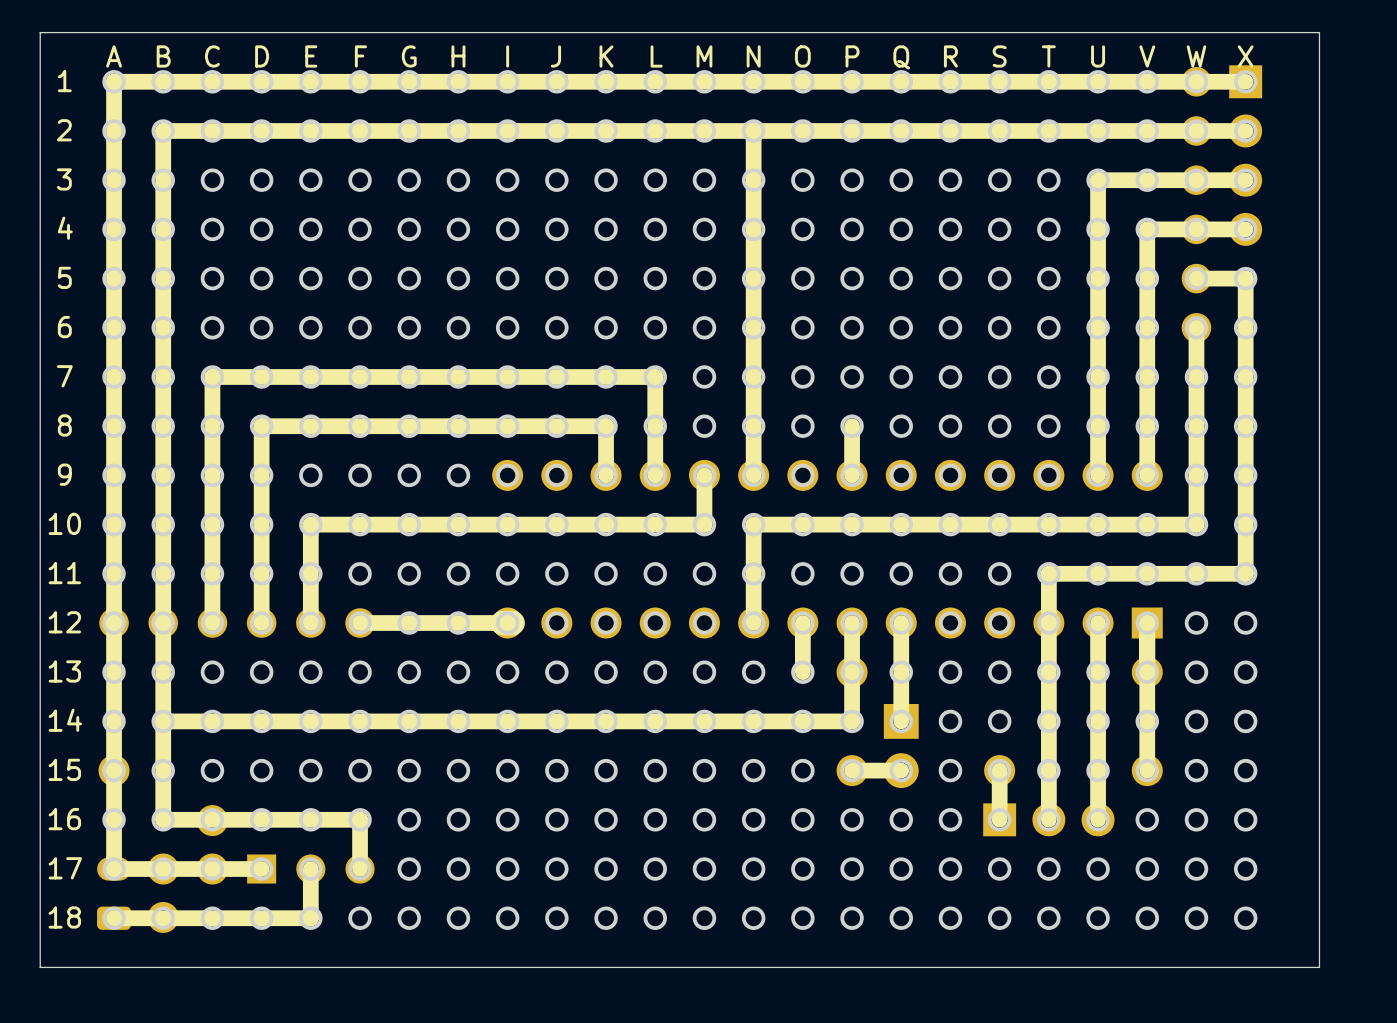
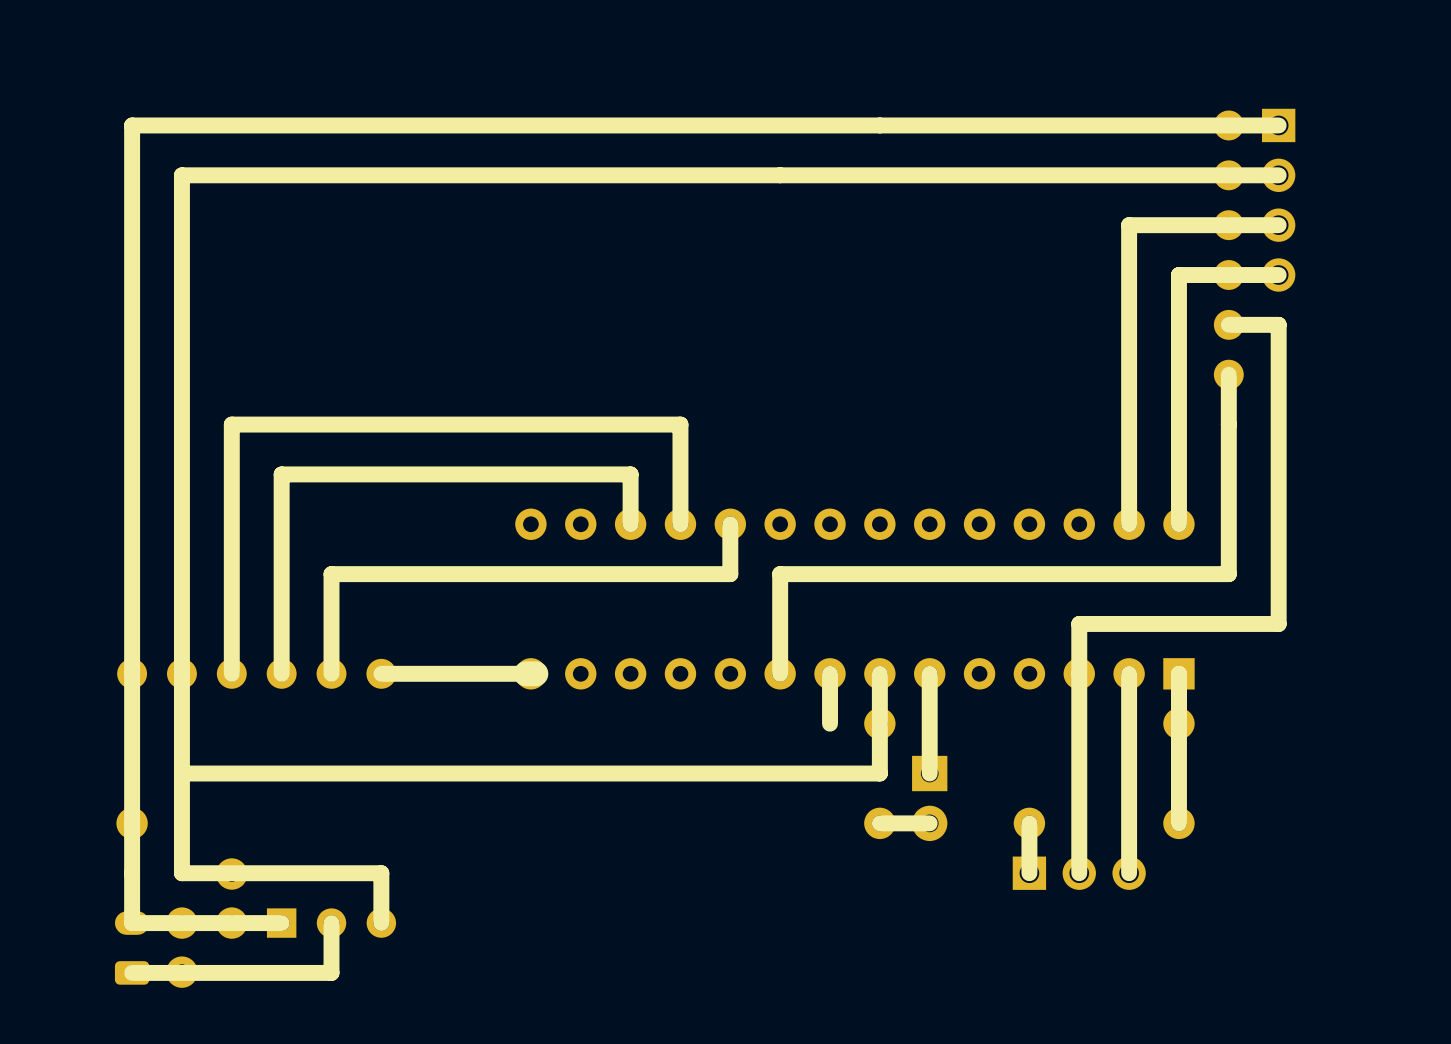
board edge: (1319, 32) (1319, 967) (40, 967) (40, 32) (1319, 32) -> none
text: A (114, 56) -> none
text: B (163, 56) -> none
text: C (212, 56) -> none
text: D (262, 56) -> none
text: E (311, 56) -> none
text: F (360, 56) -> none
text: G (409, 56) -> none
text: H (458, 56) -> none
text: I (507, 56) -> none
text: J (555, 56) -> none
text: K (606, 56) -> none
text: L (656, 56) -> none
text: M (704, 56) -> none
text: N (753, 56) -> none
text: O (802, 56) -> none
text: P (852, 56) -> none
text: R (950, 56) -> none
text: S (999, 56) -> none
text: T (1048, 56) -> none
text: U (1098, 56) -> none
text: V (1147, 56) -> none
text: W (1196, 56) -> none
text: X (1245, 56) -> none
text: Q (901, 57) -> none
round board edge: [102, 70, 126, 94] -> none
round board edge: [151, 70, 175, 94] -> none
round board edge: [200, 70, 225, 94] -> none
round board edge: [249, 70, 274, 94] -> none
round board edge: [299, 70, 323, 94] -> none
round board edge: [348, 70, 372, 94] -> none
round board edge: [397, 70, 421, 94] -> none
round board edge: [446, 70, 471, 94] -> none
round board edge: [495, 70, 520, 94] -> none
round board edge: [545, 70, 569, 94] -> none
round board edge: [594, 70, 618, 94] -> none
round board edge: [643, 70, 667, 94] -> none
round board edge: [692, 70, 717, 94] -> none
round board edge: [741, 70, 766, 94] -> none
round board edge: [791, 70, 815, 94] -> none
round board edge: [840, 70, 864, 94] -> none
round board edge: [889, 70, 913, 94] -> none
round board edge: [938, 70, 963, 94] -> none
round board edge: [987, 70, 1012, 94] -> none
round board edge: [1037, 70, 1061, 94] -> none
round board edge: [1086, 70, 1110, 94] -> none
round board edge: [1135, 70, 1159, 94] -> none
round board edge: [1184, 70, 1209, 94] -> none
round board edge: [1233, 70, 1258, 94] -> none
text: 1 (64, 81) -> none
round board edge: [102, 119, 126, 143] -> none
round board edge: [151, 119, 175, 143] -> none
round board edge: [200, 119, 225, 143] -> none
round board edge: [249, 119, 274, 143] -> none
round board edge: [299, 119, 323, 143] -> none
round board edge: [348, 119, 372, 143] -> none
round board edge: [397, 119, 421, 143] -> none
round board edge: [446, 119, 471, 143] -> none
round board edge: [495, 119, 520, 143] -> none
round board edge: [545, 119, 569, 143] -> none
round board edge: [594, 119, 618, 143] -> none
round board edge: [643, 119, 667, 143] -> none
round board edge: [692, 119, 717, 143] -> none
round board edge: [741, 119, 766, 143] -> none
round board edge: [791, 119, 815, 143] -> none
round board edge: [840, 119, 864, 143] -> none
round board edge: [889, 119, 913, 143] -> none
round board edge: [938, 119, 963, 143] -> none
round board edge: [987, 119, 1012, 143] -> none
round board edge: [1037, 119, 1061, 143] -> none
round board edge: [1086, 119, 1110, 143] -> none
round board edge: [1135, 119, 1159, 143] -> none
round board edge: [1184, 119, 1209, 143] -> none
round board edge: [1233, 119, 1258, 143] -> none
text: 2 (64, 130) -> none
line: (753, 130) (753, 475) -> none
round board edge: [102, 168, 126, 192] -> none
round board edge: [151, 168, 175, 192] -> none
round board edge: [200, 168, 225, 192] -> none
round board edge: [249, 168, 274, 192] -> none
round board edge: [299, 168, 323, 192] -> none
round board edge: [348, 168, 372, 192] -> none
round board edge: [397, 168, 421, 192] -> none
round board edge: [446, 168, 471, 192] -> none
round board edge: [495, 168, 520, 192] -> none
round board edge: [545, 168, 569, 192] -> none
round board edge: [594, 168, 618, 192] -> none
round board edge: [643, 168, 667, 192] -> none
round board edge: [692, 168, 717, 192] -> none
round board edge: [741, 168, 766, 192] -> none
round board edge: [791, 168, 815, 192] -> none
round board edge: [840, 168, 864, 192] -> none
round board edge: [889, 168, 913, 192] -> none
round board edge: [938, 168, 963, 192] -> none
round board edge: [987, 168, 1012, 192] -> none
round board edge: [1037, 168, 1061, 192] -> none
round board edge: [1086, 168, 1110, 192] -> none
round board edge: [1135, 168, 1159, 192] -> none
round board edge: [1184, 168, 1209, 192] -> none
round board edge: [1233, 168, 1258, 192] -> none
text: 3 (64, 179) -> none
round board edge: [102, 217, 126, 242] -> none
round board edge: [151, 217, 175, 242] -> none
round board edge: [200, 217, 225, 242] -> none
round board edge: [249, 217, 274, 242] -> none
round board edge: [299, 217, 323, 242] -> none
round board edge: [348, 217, 372, 242] -> none
round board edge: [397, 217, 421, 242] -> none
round board edge: [446, 217, 471, 242] -> none
round board edge: [495, 217, 520, 242] -> none
round board edge: [545, 217, 569, 242] -> none
round board edge: [594, 217, 618, 242] -> none
round board edge: [643, 217, 667, 242] -> none
round board edge: [692, 217, 717, 242] -> none
round board edge: [741, 217, 766, 242] -> none
round board edge: [791, 217, 815, 242] -> none
round board edge: [840, 217, 864, 242] -> none
round board edge: [889, 217, 913, 242] -> none
round board edge: [938, 217, 963, 242] -> none
round board edge: [987, 217, 1012, 242] -> none
round board edge: [1037, 217, 1061, 242] -> none
round board edge: [1086, 217, 1110, 242] -> none
round board edge: [1135, 217, 1159, 242] -> none
round board edge: [1184, 217, 1209, 242] -> none
round board edge: [1233, 217, 1258, 242] -> none
text: 4 (65, 228) -> none
round board edge: [102, 266, 126, 291] -> none
round board edge: [151, 266, 175, 291] -> none
round board edge: [200, 266, 225, 291] -> none
round board edge: [249, 266, 274, 291] -> none
round board edge: [299, 266, 323, 291] -> none
round board edge: [348, 266, 372, 291] -> none
round board edge: [397, 266, 421, 291] -> none
round board edge: [446, 266, 471, 291] -> none
round board edge: [495, 266, 520, 291] -> none
round board edge: [545, 266, 569, 291] -> none
round board edge: [594, 266, 618, 291] -> none
round board edge: [643, 266, 667, 291] -> none
round board edge: [692, 266, 717, 291] -> none
round board edge: [741, 266, 766, 291] -> none
round board edge: [791, 266, 815, 291] -> none
round board edge: [840, 266, 864, 291] -> none
round board edge: [889, 266, 913, 291] -> none
round board edge: [938, 266, 963, 291] -> none
round board edge: [987, 266, 1012, 291] -> none
round board edge: [1037, 266, 1061, 291] -> none
round board edge: [1086, 266, 1110, 291] -> none
round board edge: [1135, 266, 1159, 291] -> none
round board edge: [1184, 266, 1209, 291] -> none
round board edge: [1233, 266, 1258, 291] -> none
text: 5 (64, 277) -> none
round board edge: [102, 316, 126, 340] -> none
round board edge: [151, 316, 175, 340] -> none
round board edge: [200, 316, 225, 340] -> none
round board edge: [249, 316, 274, 340] -> none
round board edge: [299, 316, 323, 340] -> none
round board edge: [348, 316, 372, 340] -> none
round board edge: [397, 316, 421, 340] -> none
round board edge: [446, 316, 471, 340] -> none
round board edge: [495, 316, 520, 340] -> none
round board edge: [545, 316, 569, 340] -> none
round board edge: [594, 316, 618, 340] -> none
round board edge: [643, 316, 667, 340] -> none
round board edge: [692, 316, 717, 340] -> none
round board edge: [741, 316, 766, 340] -> none
round board edge: [791, 316, 815, 340] -> none
round board edge: [840, 316, 864, 340] -> none
round board edge: [889, 316, 913, 340] -> none
round board edge: [938, 316, 963, 340] -> none
round board edge: [987, 316, 1012, 340] -> none
round board edge: [1037, 316, 1061, 340] -> none
round board edge: [1086, 316, 1110, 340] -> none
round board edge: [1135, 316, 1159, 340] -> none
round board edge: [1184, 316, 1209, 340] -> none
round board edge: [1233, 316, 1258, 340] -> none
text: 6 (64, 327) -> none
round board edge: [102, 365, 126, 389] -> none
round board edge: [151, 365, 175, 389] -> none
round board edge: [200, 365, 225, 389] -> none
round board edge: [249, 365, 274, 389] -> none
round board edge: [299, 365, 323, 389] -> none
round board edge: [348, 365, 372, 389] -> none
round board edge: [397, 365, 421, 389] -> none
round board edge: [446, 365, 471, 389] -> none
round board edge: [495, 365, 520, 389] -> none
round board edge: [545, 365, 569, 389] -> none
round board edge: [594, 365, 618, 389] -> none
round board edge: [643, 365, 667, 389] -> none
round board edge: [692, 365, 717, 389] -> none
round board edge: [741, 365, 766, 389] -> none
round board edge: [791, 365, 815, 389] -> none
round board edge: [840, 365, 864, 389] -> none
round board edge: [889, 365, 913, 389] -> none
round board edge: [938, 365, 963, 389] -> none
round board edge: [987, 365, 1012, 389] -> none
round board edge: [1037, 365, 1061, 389] -> none
round board edge: [1086, 365, 1110, 389] -> none
round board edge: [1135, 365, 1159, 389] -> none
round board edge: [1184, 365, 1209, 389] -> none
round board edge: [1233, 365, 1258, 389] -> none
text: 7 (64, 376) -> none
round board edge: [102, 414, 126, 438] -> none
round board edge: [151, 414, 175, 438] -> none
round board edge: [200, 414, 225, 438] -> none
round board edge: [249, 414, 274, 438] -> none
round board edge: [299, 414, 323, 438] -> none
round board edge: [348, 414, 372, 438] -> none
round board edge: [397, 414, 421, 438] -> none
round board edge: [446, 414, 471, 438] -> none
round board edge: [495, 414, 520, 438] -> none
round board edge: [545, 414, 569, 438] -> none
round board edge: [594, 414, 618, 438] -> none
round board edge: [643, 414, 667, 438] -> none
round board edge: [692, 414, 717, 438] -> none
round board edge: [741, 414, 766, 438] -> none
round board edge: [791, 414, 815, 438] -> none
round board edge: [840, 414, 864, 438] -> none
round board edge: [889, 414, 913, 438] -> none
round board edge: [938, 414, 963, 438] -> none
round board edge: [987, 414, 1012, 438] -> none
round board edge: [1037, 414, 1061, 438] -> none
round board edge: [1086, 414, 1110, 438] -> none
round board edge: [1135, 414, 1159, 438] -> none
round board edge: [1184, 414, 1209, 438] -> none
round board edge: [1233, 414, 1258, 438] -> none
text: 8 (64, 425) -> none
line: (852, 426) (852, 475) -> none
round board edge: [102, 463, 126, 488] -> none
round board edge: [151, 463, 175, 488] -> none
round board edge: [200, 463, 225, 488] -> none
round board edge: [249, 463, 274, 488] -> none
round board edge: [299, 463, 323, 488] -> none
round board edge: [348, 463, 372, 488] -> none
round board edge: [397, 463, 421, 488] -> none
round board edge: [446, 463, 471, 488] -> none
round board edge: [495, 463, 520, 488] -> none
round board edge: [545, 463, 569, 488] -> none
round board edge: [594, 463, 618, 488] -> none
round board edge: [643, 463, 667, 488] -> none
round board edge: [692, 463, 717, 488] -> none
round board edge: [741, 463, 766, 488] -> none
round board edge: [791, 463, 815, 488] -> none
round board edge: [840, 463, 864, 488] -> none
round board edge: [889, 463, 913, 488] -> none
round board edge: [938, 463, 963, 488] -> none
round board edge: [987, 463, 1012, 488] -> none
round board edge: [1037, 463, 1061, 488] -> none
round board edge: [1086, 463, 1110, 488] -> none
round board edge: [1135, 463, 1159, 488] -> none
round board edge: [1184, 463, 1209, 488] -> none
round board edge: [1233, 463, 1258, 488] -> none
text: 9 (64, 474) -> none
round board edge: [102, 512, 126, 537] -> none
round board edge: [151, 512, 175, 537] -> none
round board edge: [200, 512, 225, 537] -> none
round board edge: [249, 512, 274, 537] -> none
round board edge: [299, 512, 323, 537] -> none
round board edge: [348, 512, 372, 537] -> none
round board edge: [397, 512, 421, 537] -> none
round board edge: [446, 512, 471, 537] -> none
round board edge: [495, 512, 520, 537] -> none
round board edge: [545, 512, 569, 537] -> none
round board edge: [594, 512, 618, 537] -> none
round board edge: [643, 512, 667, 537] -> none
round board edge: [692, 512, 717, 537] -> none
round board edge: [741, 512, 766, 537] -> none
round board edge: [791, 512, 815, 537] -> none
round board edge: [840, 512, 864, 537] -> none
round board edge: [889, 512, 913, 537] -> none
round board edge: [938, 512, 963, 537] -> none
round board edge: [987, 512, 1012, 537] -> none
round board edge: [1037, 512, 1061, 537] -> none
round board edge: [1086, 512, 1110, 537] -> none
round board edge: [1135, 512, 1159, 537] -> none
round board edge: [1184, 512, 1209, 537] -> none
round board edge: [1233, 512, 1258, 537] -> none
text: 10 (64, 523) -> none
round board edge: [102, 562, 126, 586] -> none
round board edge: [151, 562, 175, 586] -> none
round board edge: [200, 562, 225, 586] -> none
round board edge: [249, 562, 274, 586] -> none
round board edge: [299, 562, 323, 586] -> none
round board edge: [348, 562, 372, 586] -> none
round board edge: [397, 562, 421, 586] -> none
round board edge: [446, 562, 471, 586] -> none
round board edge: [495, 562, 520, 586] -> none
round board edge: [545, 562, 569, 586] -> none
round board edge: [594, 562, 618, 586] -> none
round board edge: [643, 562, 667, 586] -> none
round board edge: [692, 562, 717, 586] -> none
round board edge: [741, 562, 766, 586] -> none
round board edge: [791, 562, 815, 586] -> none
round board edge: [840, 562, 864, 586] -> none
round board edge: [889, 562, 913, 586] -> none
round board edge: [938, 562, 963, 586] -> none
round board edge: [987, 562, 1012, 586] -> none
round board edge: [1037, 562, 1061, 586] -> none
round board edge: [1086, 562, 1110, 586] -> none
round board edge: [1135, 562, 1159, 586] -> none
round board edge: [1184, 562, 1209, 586] -> none
round board edge: [1233, 562, 1258, 586] -> none
text: 11 (64, 573) -> none
round board edge: [102, 611, 126, 635] -> none
round board edge: [151, 611, 175, 635] -> none
round board edge: [200, 611, 225, 635] -> none
round board edge: [249, 611, 274, 635] -> none
round board edge: [299, 611, 323, 635] -> none
round board edge: [348, 611, 372, 635] -> none
round board edge: [397, 611, 421, 635] -> none
round board edge: [446, 611, 471, 635] -> none
round board edge: [495, 611, 520, 635] -> none
round board edge: [545, 611, 569, 635] -> none
round board edge: [594, 611, 618, 635] -> none
round board edge: [643, 611, 667, 635] -> none
round board edge: [692, 611, 717, 635] -> none
round board edge: [741, 611, 766, 635] -> none
round board edge: [791, 611, 815, 635] -> none
round board edge: [840, 611, 864, 635] -> none
round board edge: [889, 611, 913, 635] -> none
round board edge: [938, 611, 963, 635] -> none
round board edge: [987, 611, 1012, 635] -> none
round board edge: [1037, 611, 1061, 635] -> none
round board edge: [1086, 611, 1110, 635] -> none
round board edge: [1135, 611, 1159, 635] -> none
round board edge: [1184, 611, 1209, 635] -> none
round board edge: [1233, 611, 1258, 635] -> none
text: 12 (64, 622) -> none
round board edge: [102, 660, 126, 684] -> none
round board edge: [151, 660, 175, 684] -> none
round board edge: [200, 660, 225, 684] -> none
round board edge: [249, 660, 274, 684] -> none
round board edge: [299, 660, 323, 684] -> none
round board edge: [348, 660, 372, 684] -> none
round board edge: [397, 660, 421, 684] -> none
round board edge: [446, 660, 471, 684] -> none
round board edge: [495, 660, 520, 684] -> none
round board edge: [545, 660, 569, 684] -> none
round board edge: [594, 660, 618, 684] -> none
round board edge: [643, 660, 667, 684] -> none
round board edge: [692, 660, 717, 684] -> none
round board edge: [741, 660, 766, 684] -> none
round board edge: [791, 660, 815, 684] -> none
round board edge: [840, 660, 864, 684] -> none
round board edge: [889, 660, 913, 684] -> none
round board edge: [938, 660, 963, 684] -> none
round board edge: [987, 660, 1012, 684] -> none
round board edge: [1037, 660, 1061, 684] -> none
round board edge: [1086, 660, 1110, 684] -> none
round board edge: [1135, 660, 1159, 684] -> none
round board edge: [1184, 660, 1209, 684] -> none
round board edge: [1233, 660, 1258, 684] -> none
text: 13 (64, 671) -> none
round board edge: [102, 709, 126, 734] -> none
round board edge: [151, 709, 175, 734] -> none
round board edge: [200, 709, 225, 734] -> none
round board edge: [249, 709, 274, 734] -> none
round board edge: [299, 709, 323, 734] -> none
round board edge: [348, 709, 372, 734] -> none
round board edge: [397, 709, 421, 734] -> none
round board edge: [446, 709, 471, 734] -> none
round board edge: [495, 709, 520, 734] -> none
round board edge: [545, 709, 569, 734] -> none
round board edge: [594, 709, 618, 734] -> none
round board edge: [643, 709, 667, 734] -> none
round board edge: [692, 709, 717, 734] -> none
round board edge: [741, 709, 766, 734] -> none
round board edge: [791, 709, 815, 734] -> none
round board edge: [840, 709, 864, 734] -> none
round board edge: [889, 709, 913, 734] -> none
round board edge: [938, 709, 963, 734] -> none
round board edge: [987, 709, 1012, 734] -> none
round board edge: [1037, 709, 1061, 734] -> none
round board edge: [1086, 709, 1110, 734] -> none
round board edge: [1135, 709, 1159, 734] -> none
round board edge: [1184, 709, 1209, 734] -> none
round board edge: [1233, 709, 1258, 734] -> none
text: 14 (65, 720) -> none
round board edge: [102, 758, 126, 783] -> none
round board edge: [151, 758, 175, 783] -> none
round board edge: [200, 758, 225, 783] -> none
round board edge: [249, 758, 274, 783] -> none
round board edge: [299, 758, 323, 783] -> none
round board edge: [348, 758, 372, 783] -> none
round board edge: [397, 758, 421, 783] -> none
round board edge: [446, 758, 471, 783] -> none
round board edge: [495, 758, 520, 783] -> none
round board edge: [545, 758, 569, 783] -> none
round board edge: [594, 758, 618, 783] -> none
round board edge: [643, 758, 667, 783] -> none
round board edge: [692, 758, 717, 783] -> none
round board edge: [741, 758, 766, 783] -> none
round board edge: [791, 758, 815, 783] -> none
round board edge: [840, 758, 864, 783] -> none
round board edge: [889, 758, 913, 783] -> none
round board edge: [938, 758, 963, 783] -> none
round board edge: [987, 758, 1012, 783] -> none
round board edge: [1037, 758, 1061, 783] -> none
round board edge: [1086, 758, 1110, 783] -> none
round board edge: [1135, 758, 1159, 783] -> none
round board edge: [1184, 758, 1209, 783] -> none
round board edge: [1233, 758, 1258, 783] -> none
text: 15 (64, 769) -> none
round board edge: [102, 808, 126, 832] -> none
round board edge: [151, 808, 175, 832] -> none
round board edge: [200, 808, 225, 832] -> none
round board edge: [249, 808, 274, 832] -> none
round board edge: [299, 808, 323, 832] -> none
round board edge: [348, 808, 372, 832] -> none
round board edge: [397, 808, 421, 832] -> none
round board edge: [446, 808, 471, 832] -> none
round board edge: [495, 808, 520, 832] -> none
round board edge: [545, 808, 569, 832] -> none
round board edge: [594, 808, 618, 832] -> none
round board edge: [643, 808, 667, 832] -> none
round board edge: [692, 808, 717, 832] -> none
round board edge: [741, 808, 766, 832] -> none
round board edge: [791, 808, 815, 832] -> none
round board edge: [840, 808, 864, 832] -> none
round board edge: [889, 808, 913, 832] -> none
round board edge: [938, 808, 963, 832] -> none
round board edge: [987, 808, 1012, 832] -> none
round board edge: [1037, 808, 1061, 832] -> none
round board edge: [1086, 808, 1110, 832] -> none
round board edge: [1135, 808, 1159, 832] -> none
round board edge: [1184, 808, 1209, 832] -> none
round board edge: [1233, 808, 1258, 832] -> none
text: 16 (64, 819) -> none
round board edge: [102, 857, 126, 881] -> none
round board edge: [151, 857, 175, 881] -> none
round board edge: [200, 857, 225, 881] -> none
round board edge: [249, 857, 274, 881] -> none
round board edge: [299, 857, 323, 881] -> none
round board edge: [348, 857, 372, 881] -> none
round board edge: [397, 857, 421, 881] -> none
round board edge: [446, 857, 471, 881] -> none
round board edge: [495, 857, 520, 881] -> none
round board edge: [545, 857, 569, 881] -> none
round board edge: [594, 857, 618, 881] -> none
round board edge: [643, 857, 667, 881] -> none
round board edge: [692, 857, 717, 881] -> none
round board edge: [741, 857, 766, 881] -> none
round board edge: [791, 857, 815, 881] -> none
round board edge: [840, 857, 864, 881] -> none
round board edge: [889, 857, 913, 881] -> none
round board edge: [938, 857, 963, 881] -> none
round board edge: [987, 857, 1012, 881] -> none
round board edge: [1037, 857, 1061, 881] -> none
round board edge: [1086, 857, 1110, 881] -> none
round board edge: [1135, 857, 1159, 881] -> none
round board edge: [1184, 857, 1209, 881] -> none
round board edge: [1233, 857, 1258, 881] -> none
text: 17 (65, 868) -> none
round board edge: [102, 906, 126, 930] -> none
round board edge: [151, 906, 175, 930] -> none
round board edge: [200, 906, 225, 930] -> none
round board edge: [249, 906, 274, 930] -> none
round board edge: [299, 906, 323, 930] -> none
round board edge: [348, 906, 372, 930] -> none
round board edge: [397, 906, 421, 930] -> none
round board edge: [446, 906, 471, 930] -> none
round board edge: [495, 906, 520, 930] -> none
round board edge: [545, 906, 569, 930] -> none
round board edge: [594, 906, 618, 930] -> none
round board edge: [643, 906, 667, 930] -> none
round board edge: [692, 906, 717, 930] -> none
round board edge: [741, 906, 766, 930] -> none
round board edge: [791, 906, 815, 930] -> none
round board edge: [840, 906, 864, 930] -> none
round board edge: [889, 906, 913, 930] -> none
round board edge: [938, 906, 963, 930] -> none
round board edge: [987, 906, 1012, 930] -> none
round board edge: [1037, 906, 1061, 930] -> none
round board edge: [1086, 906, 1110, 930] -> none
round board edge: [1135, 906, 1159, 930] -> none
round board edge: [1184, 906, 1209, 930] -> none
round board edge: [1233, 906, 1258, 930] -> none
text: 18 (64, 917) -> none

